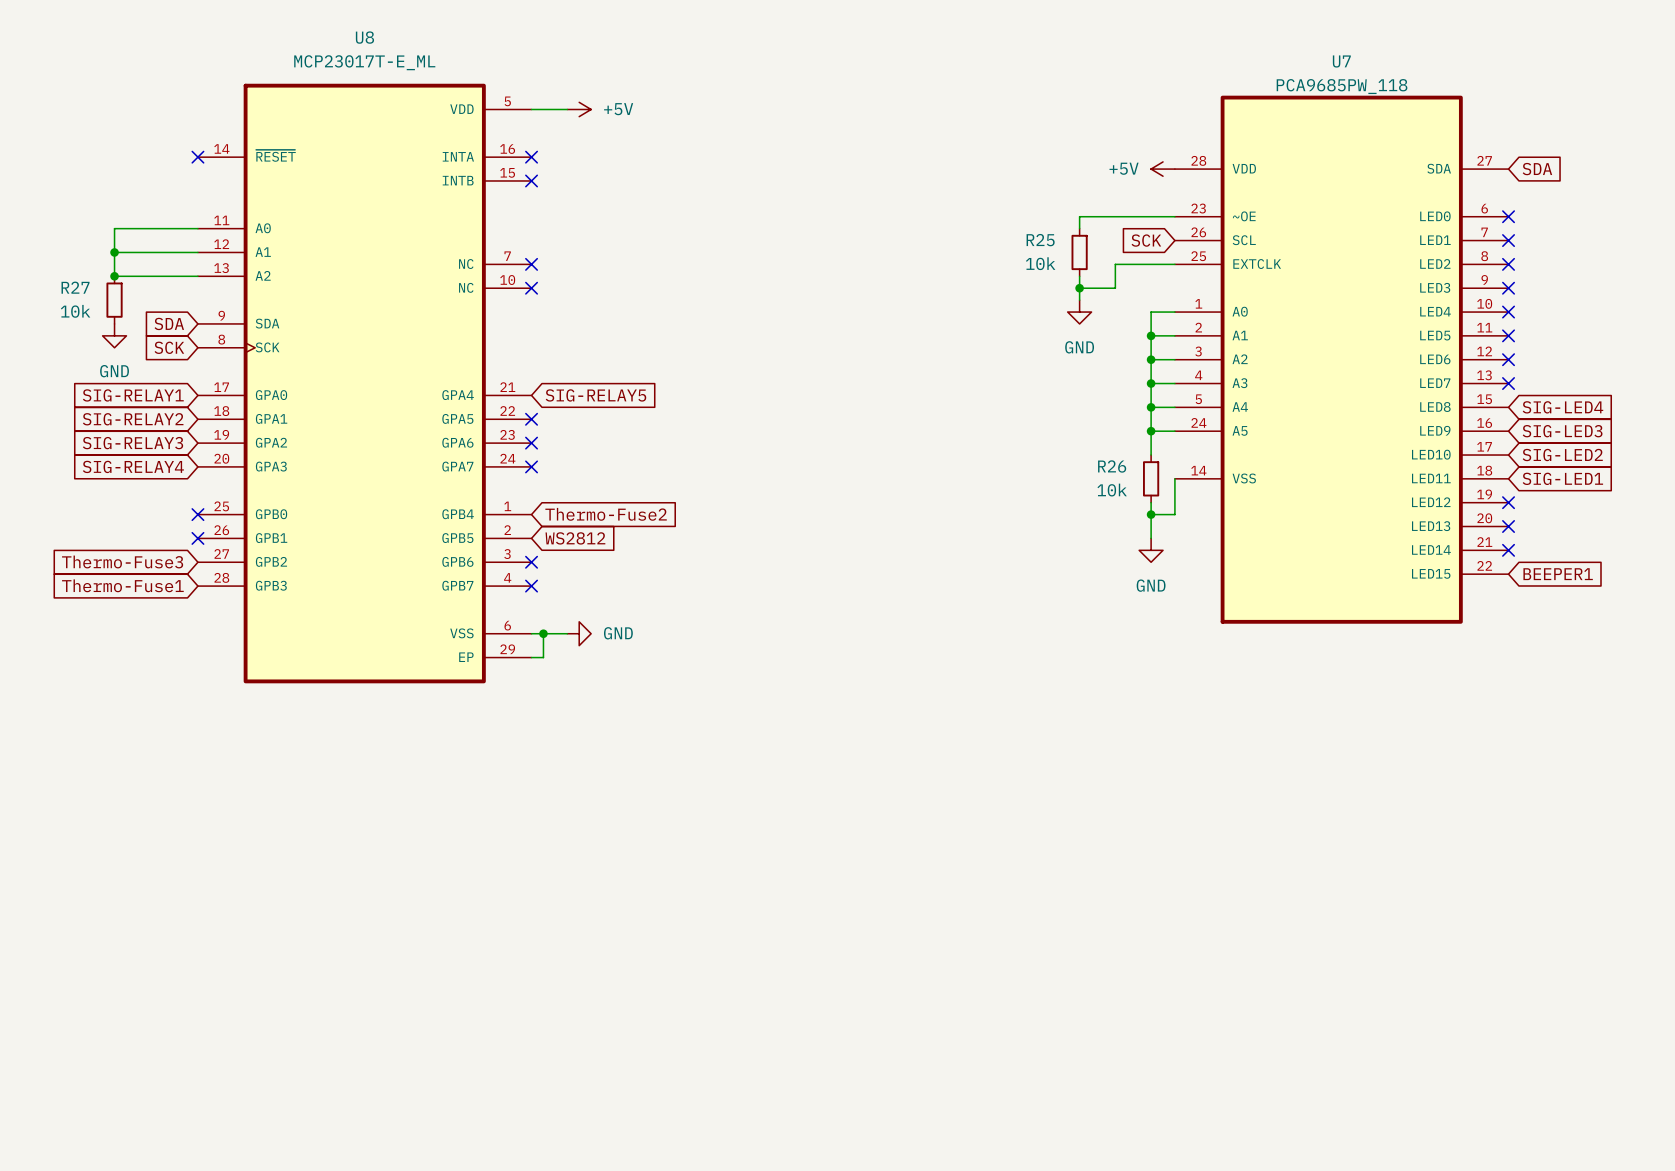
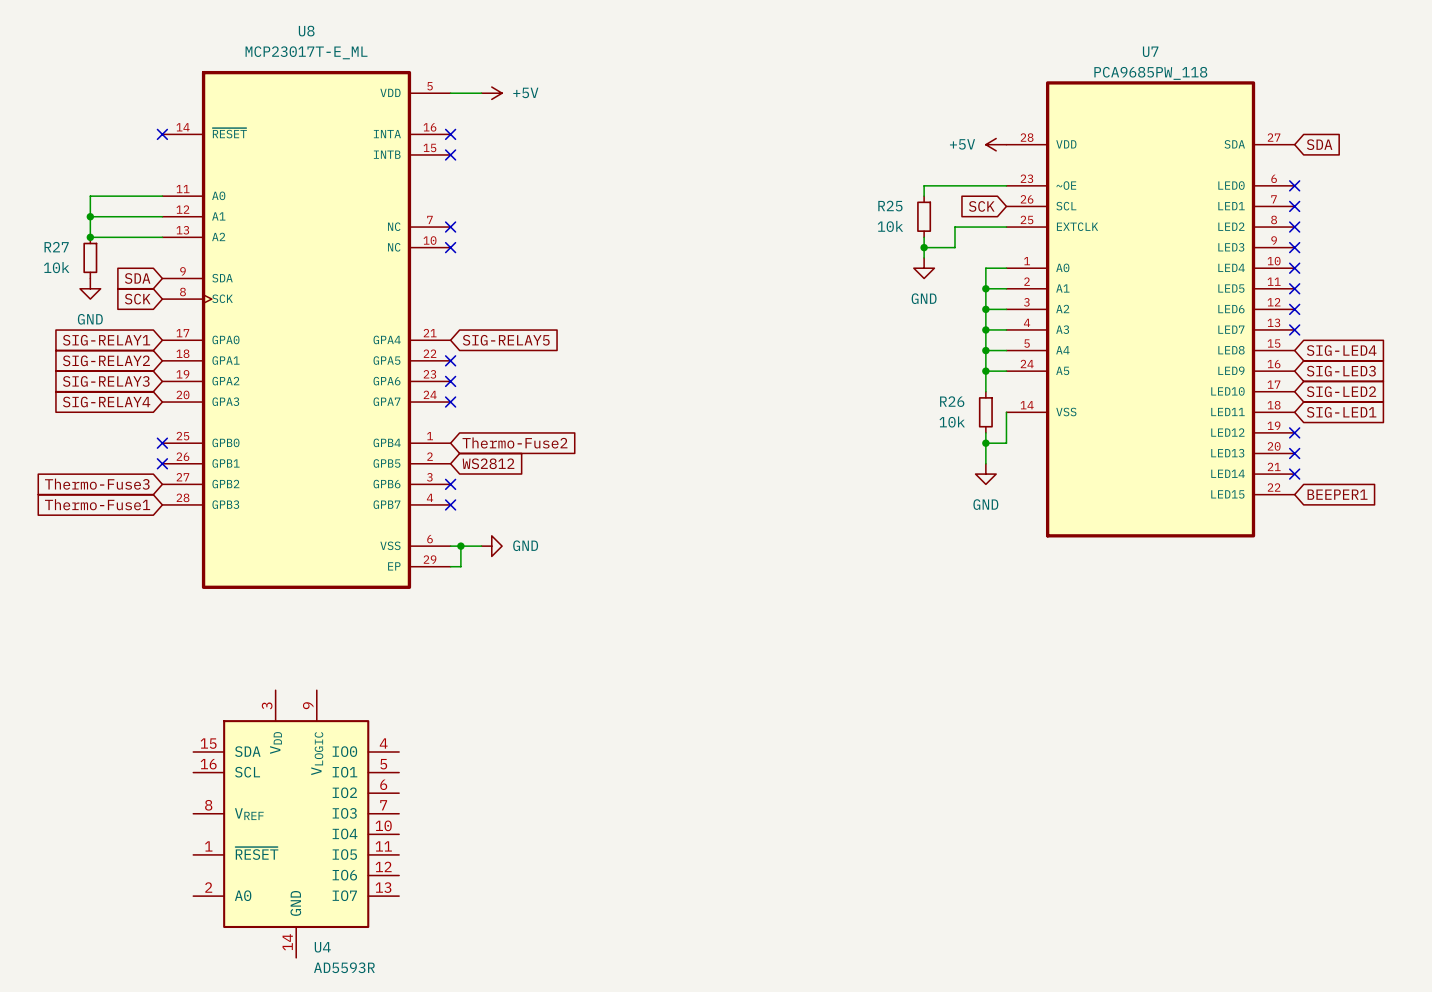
U4: none -> AD5593R (296, 824)

